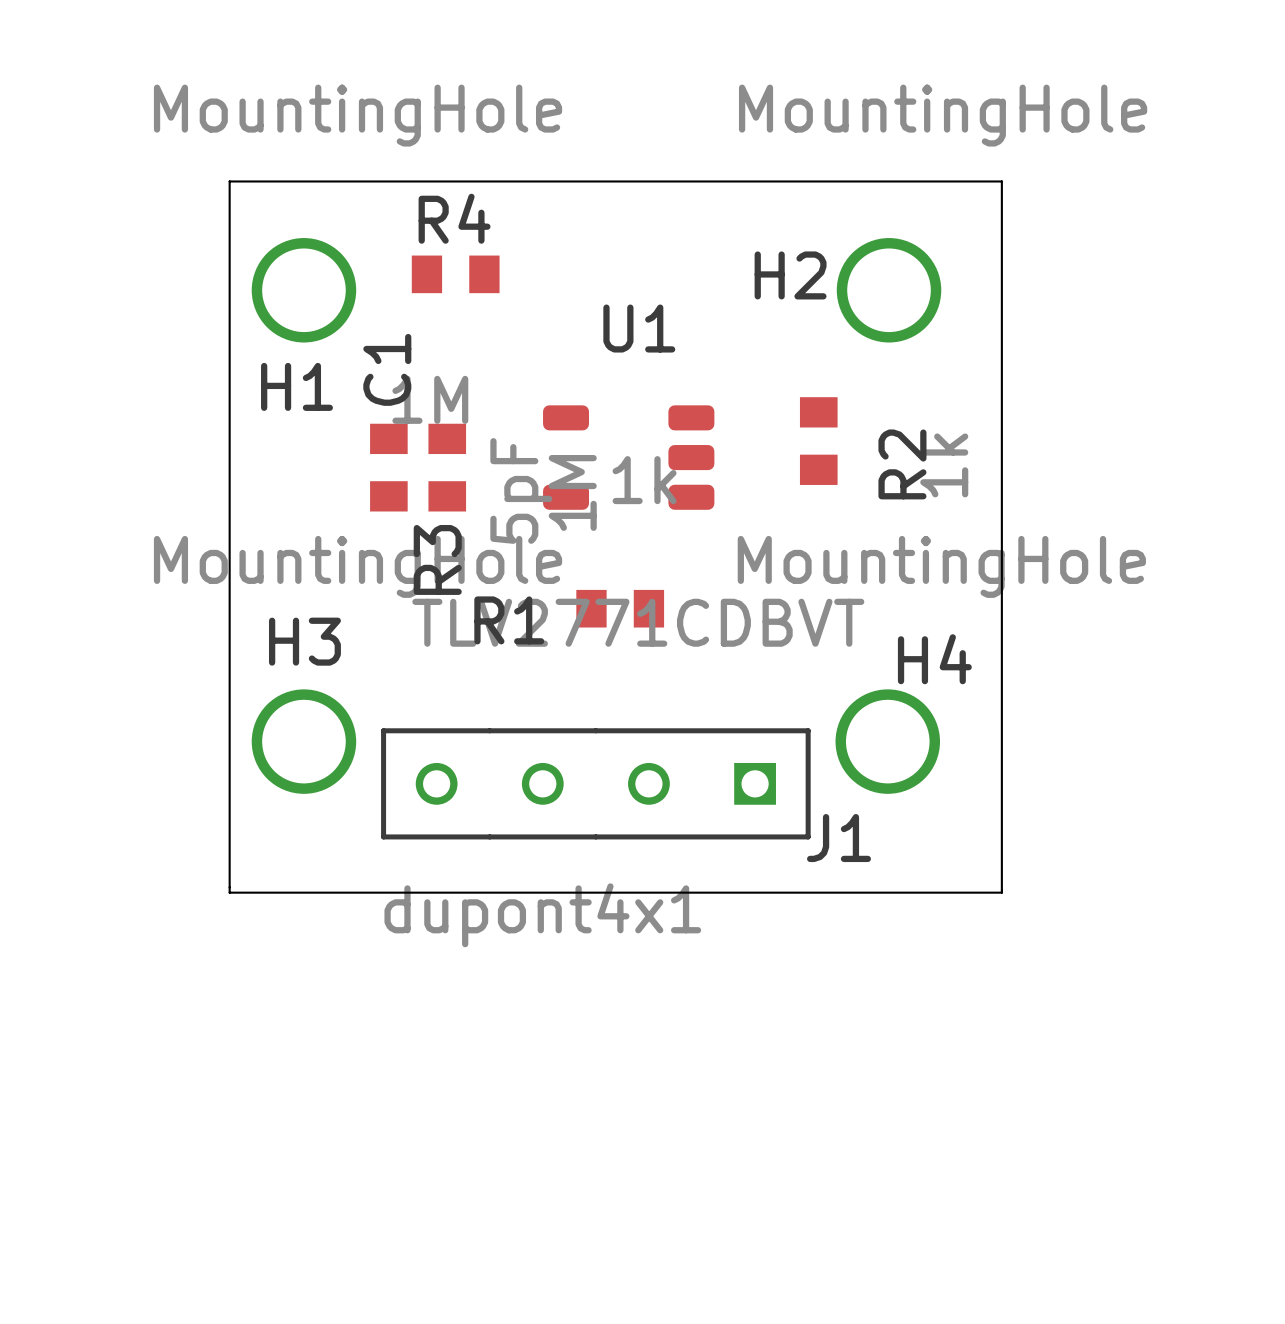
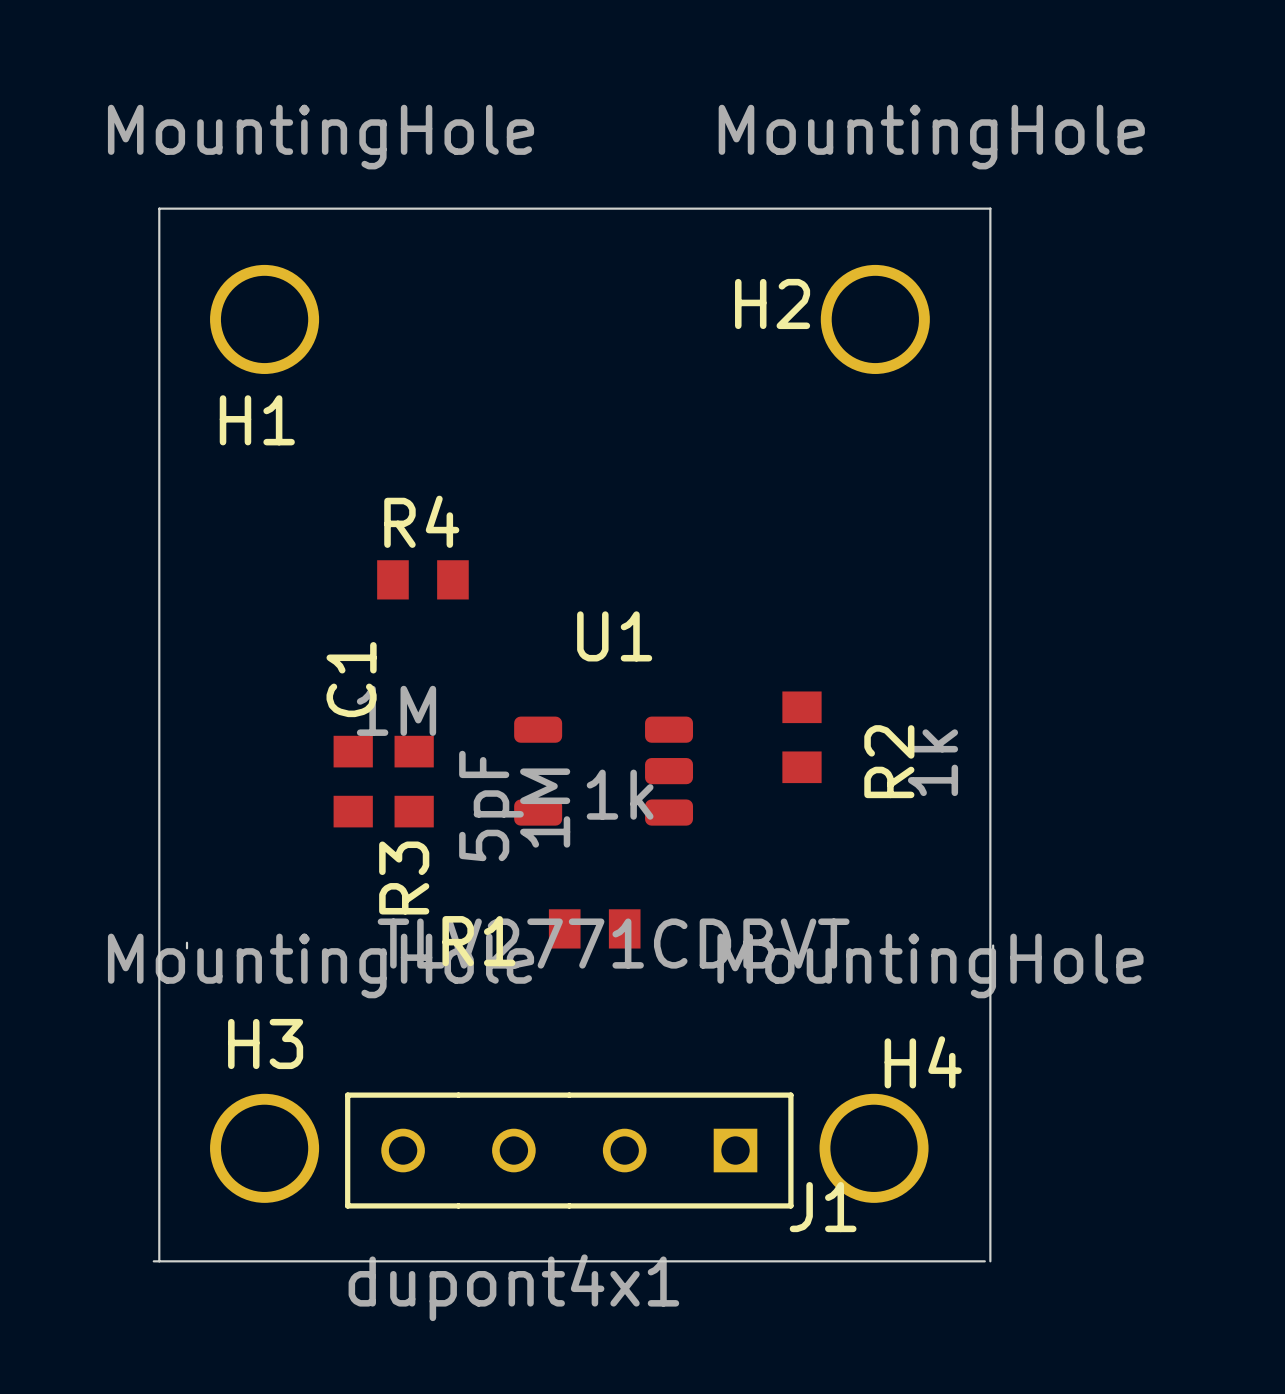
R4 position: (455, 274) -> (422, 579)
R2 position: (818, 441) -> (801, 737)
U1 position: (628, 457) -> (603, 771)
C1 position: (388, 467) -> (353, 781)
R3 position: (447, 467) -> (414, 781)
R1 position: (620, 608) -> (594, 928)
H3 position: (303, 741) -> (264, 1148)
H4 position: (887, 741) -> (874, 1148)
J1 position: (595, 783) -> (569, 1150)
board edge: (229, 887) (229, 181) (1001, 181) (1001, 890) -> none
board edge: (229, 892) (1001, 892) -> none
board edge: none -> (153, 1261) (984, 1261)
board edge: none -> (159, 1261) (159, 208) (990, 208) (990, 1261)

